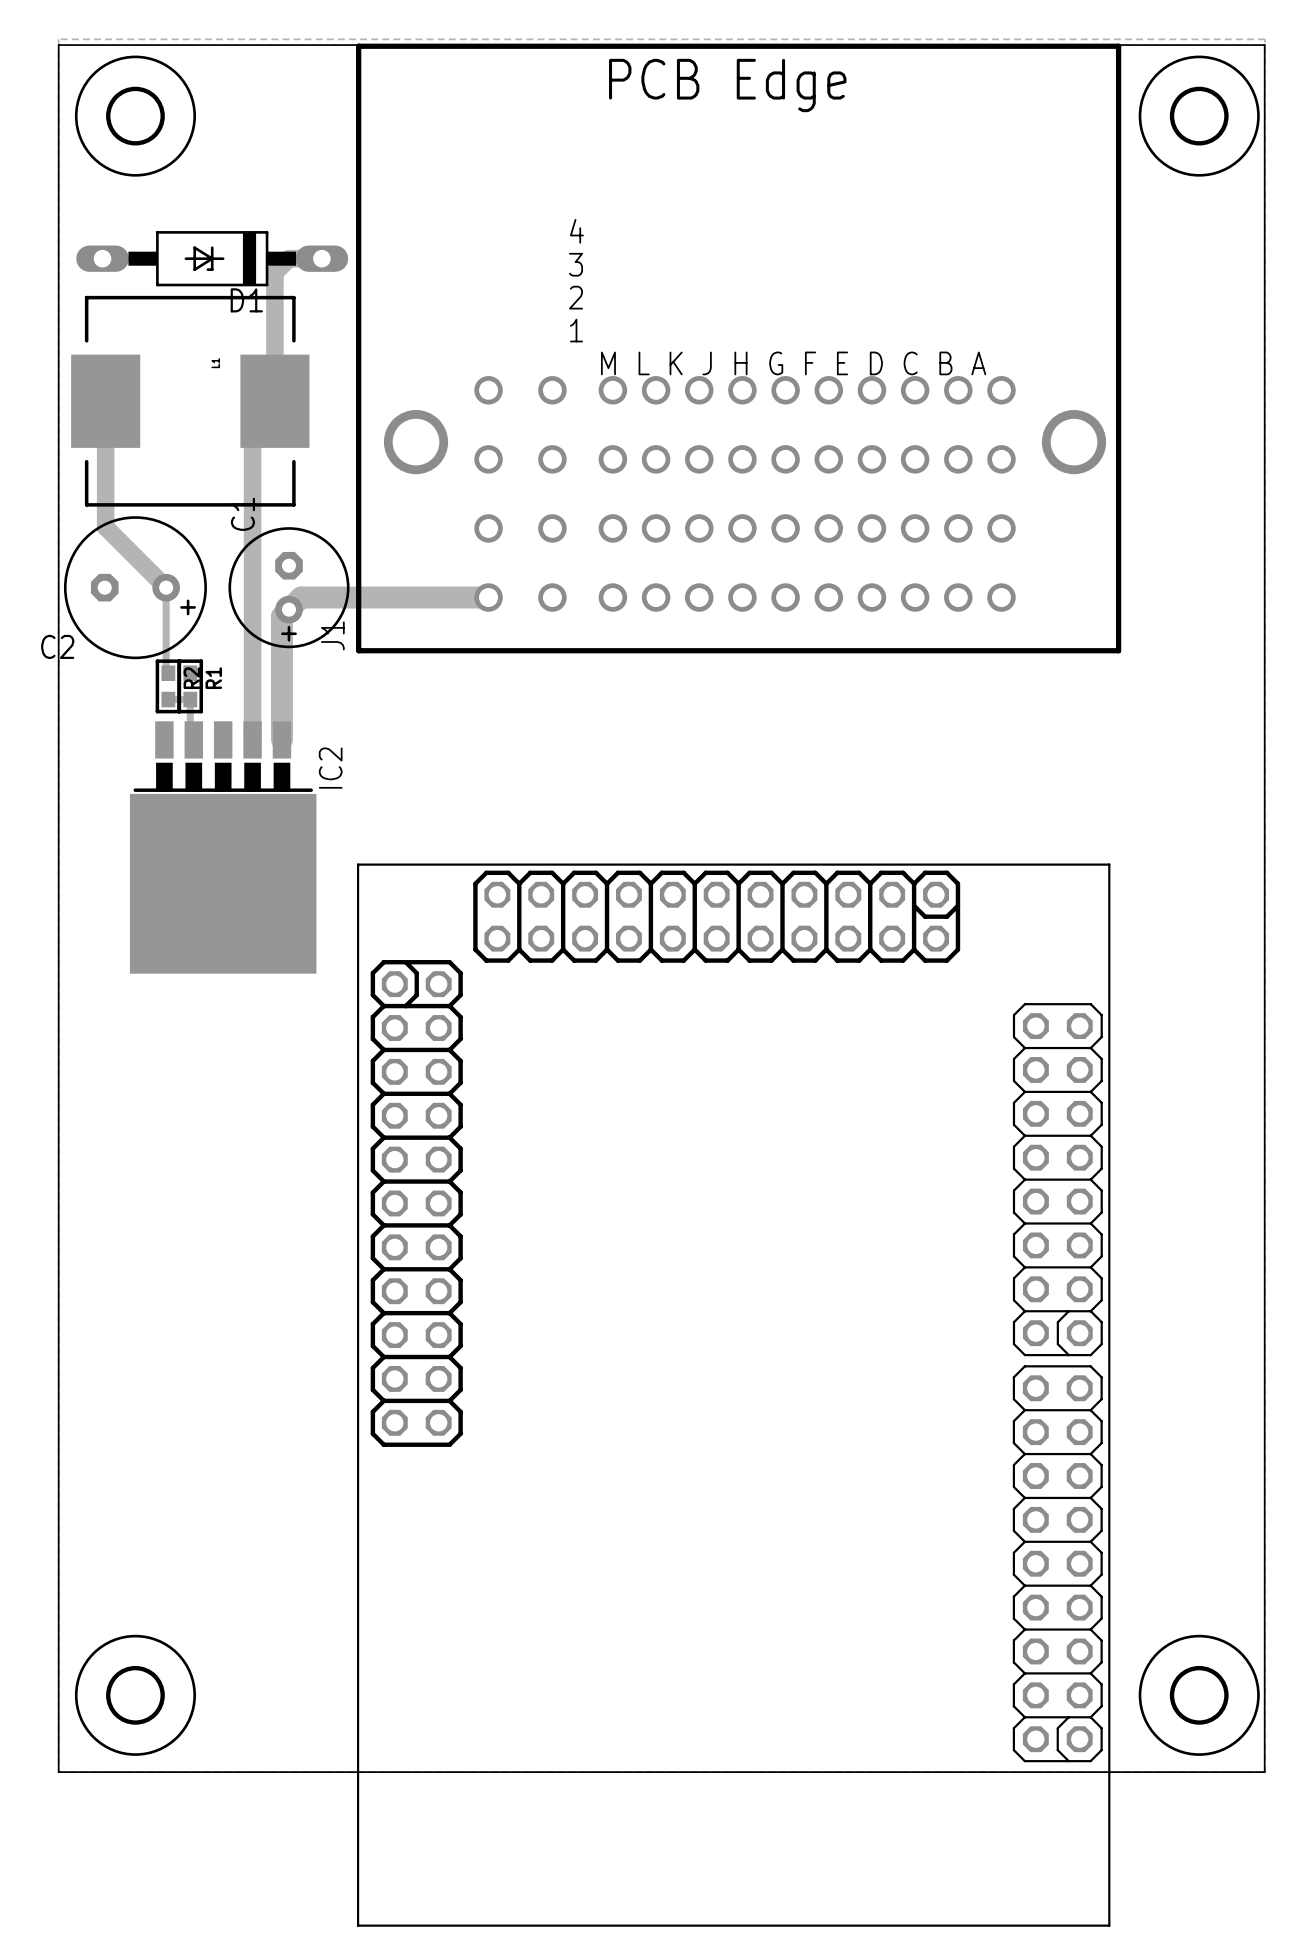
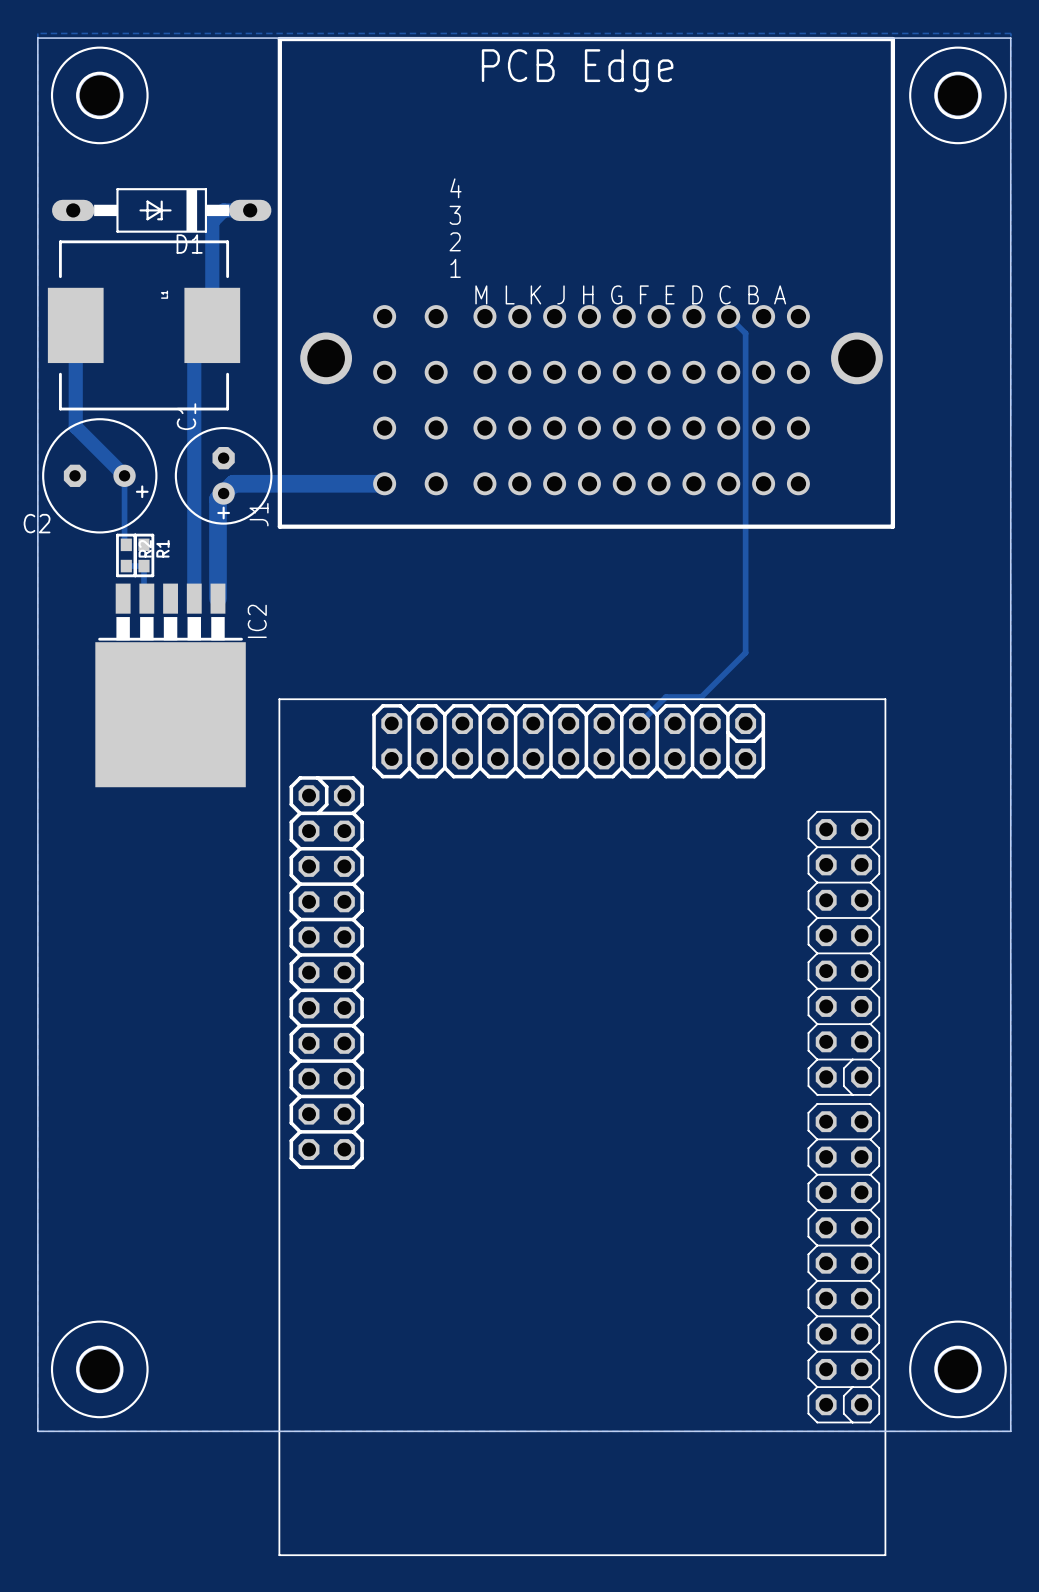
track: none -> (728, 316) (745, 333) (745, 652) (701, 697) (666, 697) (639, 723)

